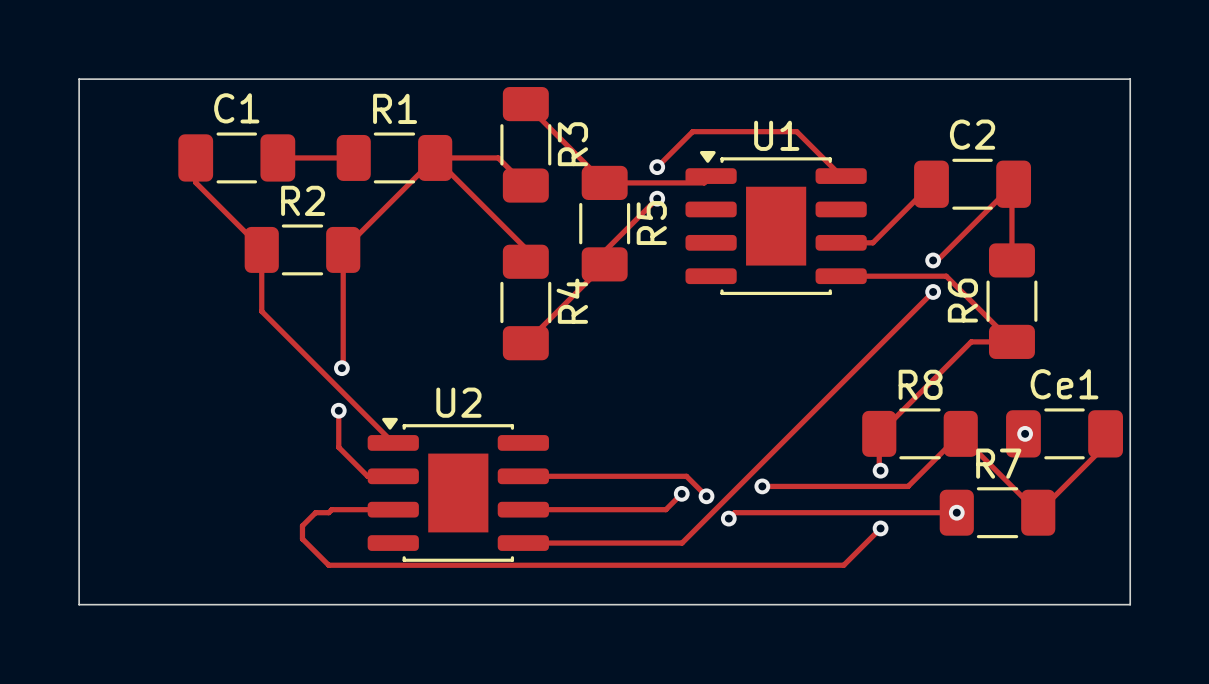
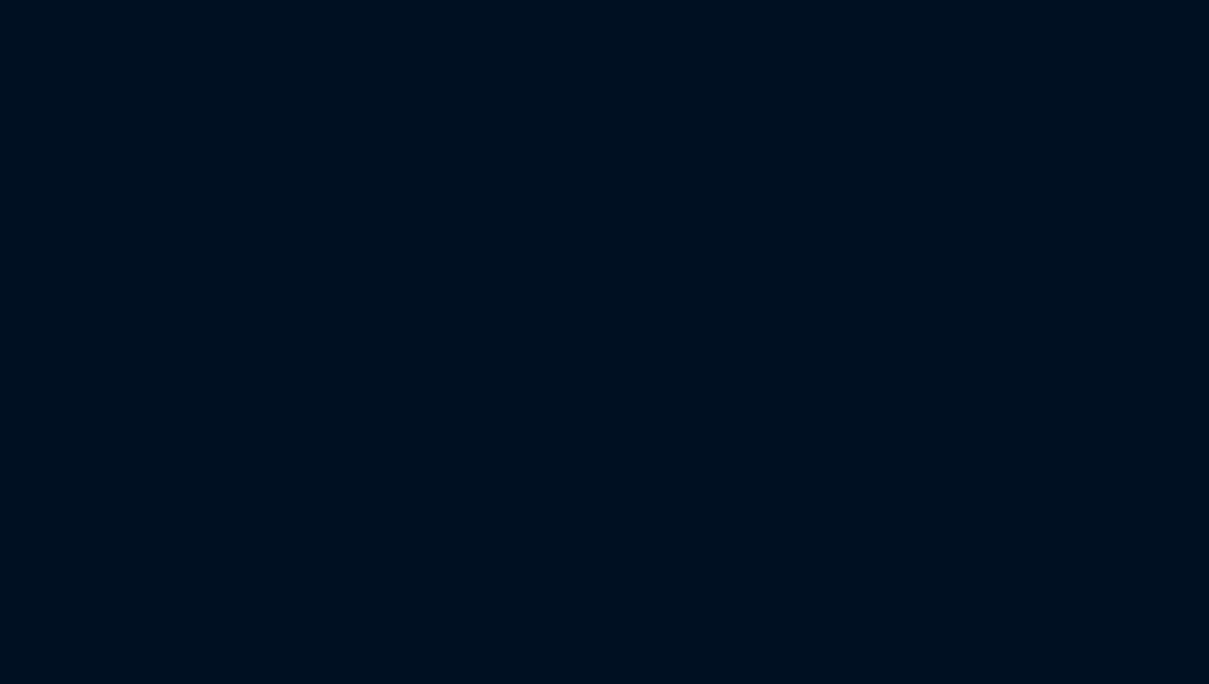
board edge: (79, 79) (1130, 79) (1130, 604) (79, 604) (79, 79) -> none
track: (525, 104) (604, 182) (704, 182) (711, 176) -> none
R3: (525, 144) -> none
track: (195, 157) (195, 182) (261, 248) (261, 311) (393, 442) -> none
C1: (236, 157) -> none
track: (277, 157) (353, 157) -> none
R1: (394, 157) -> none
track: (435, 157) (498, 157) (525, 185) -> none
track: (435, 157) (525, 248) (525, 261) -> none
track: (435, 157) (343, 249) (341, 368) -> none
track: (657, 167) (692, 131) (796, 131) (841, 176) -> none
via: (657, 167) -> none
track: (931, 184) (872, 242) (841, 242) -> none
C2: (972, 184) -> none
track: (1013, 184) (937, 260) (933, 260) -> none
track: (1011, 185) (1011, 260) -> none
track: (657, 198) (604, 251) (604, 264) (525, 343) -> none
via: (657, 198) -> none
U1: (776, 222) -> none
R5: (604, 223) -> none
R2: (302, 249) -> none
via: (933, 260) -> none
track: (841, 276) (946, 276) (1011, 341) (971, 341) (879, 433) (880, 470) -> none
track: (933, 291) (682, 543) (523, 543) -> none
via: (933, 291) -> none
R6: (1011, 301) -> none
R4: (525, 302) -> none
via: (341, 368) -> none
track: (338, 410) (338, 447) (367, 476) (393, 476) -> none
via: (338, 410) -> none
R8: (920, 433) -> none
via: (1025, 433) -> none
Ce1: (1064, 433) -> none
track: (1105, 433) (1105, 445) (1038, 512) (960, 433) (908, 486) (762, 486) -> none
via: (880, 470) -> none
track: (523, 476) (686, 476) (706, 496) -> none
via: (762, 486) -> none
U2: (458, 489) -> none
track: (681, 493) (665, 509) (523, 509) -> none
via: (681, 493) -> none
via: (706, 496) -> none
track: (393, 509) (331, 509) (328, 512) (315, 512) (302, 525) (302, 538) (328, 565) (843, 565) (880, 528) -> none
track: (956, 512) (734, 512) (728, 518) -> none
via: (956, 512) -> none
R7: (997, 512) -> none
via: (728, 518) -> none
via: (880, 528) -> none

